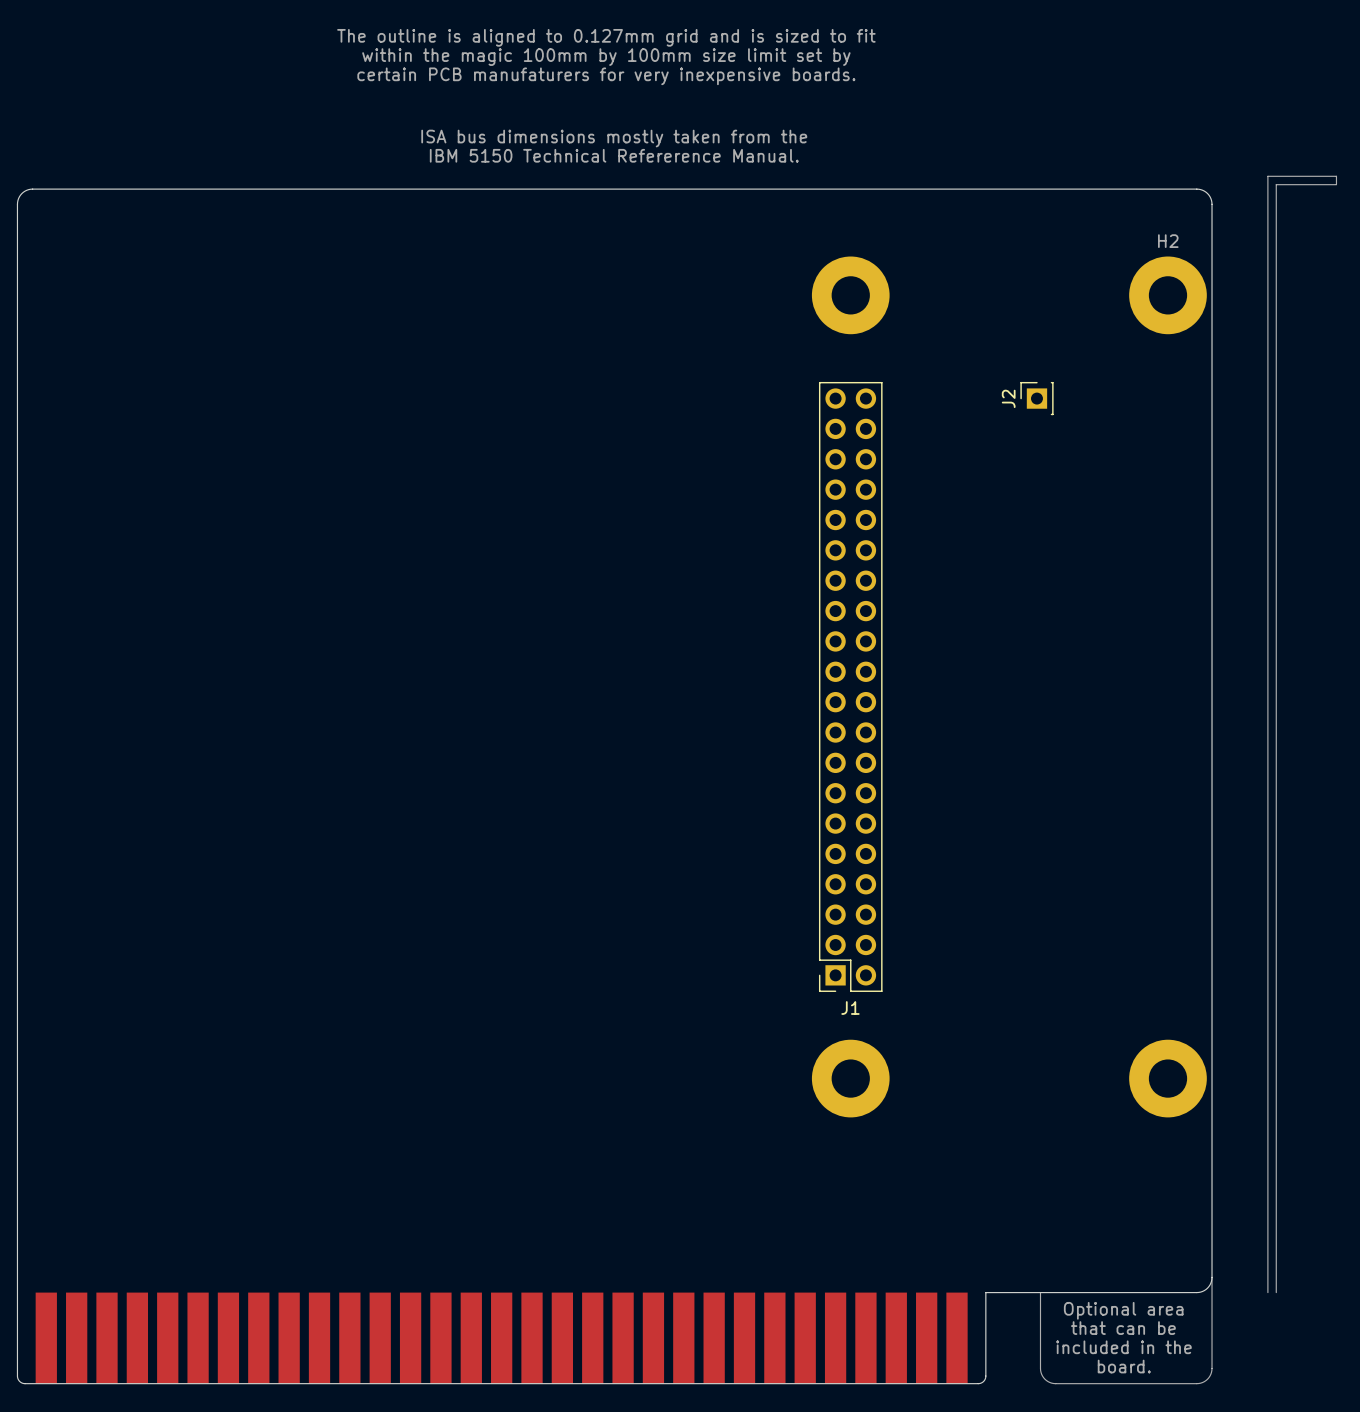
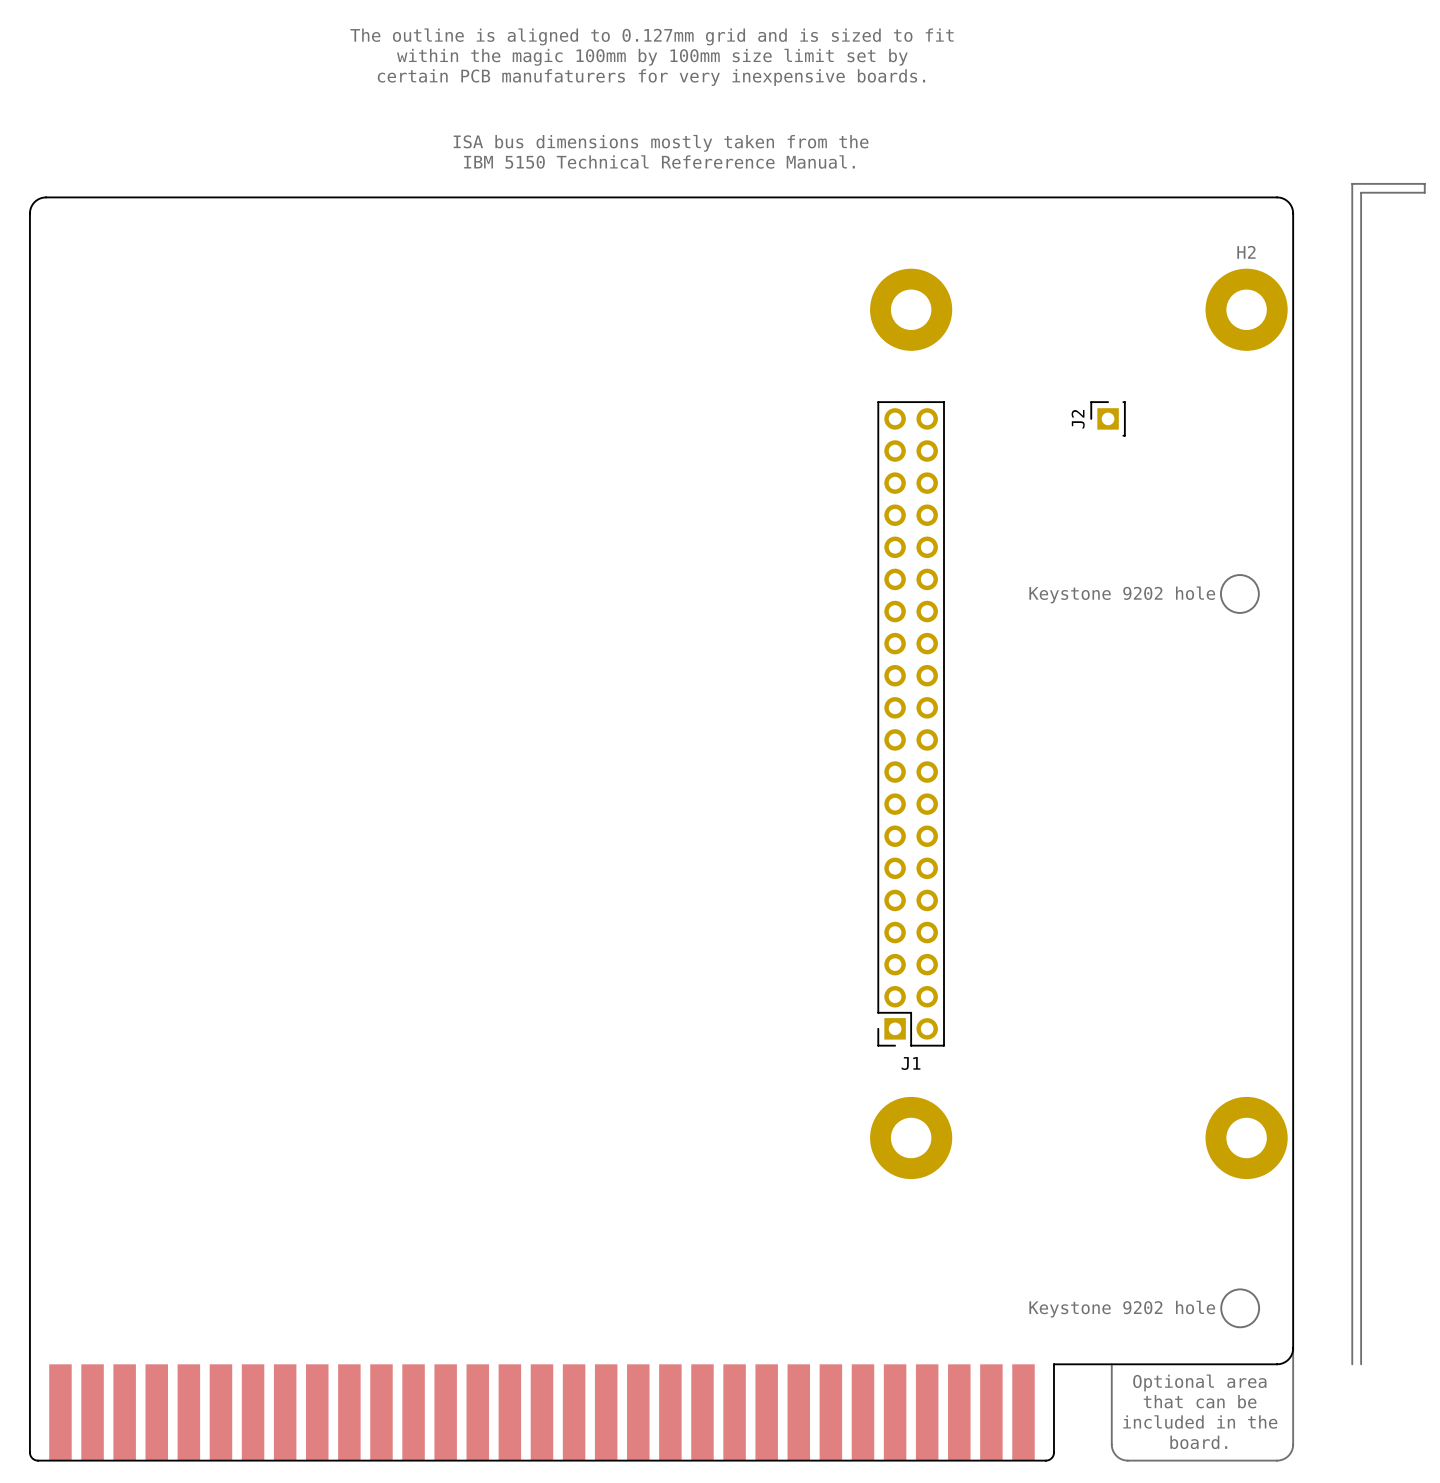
drawing: none -> [1220, 574, 1260, 614]
text: none -> Keystone 9202 hole (1122, 594)
drawing: none -> [1220, 1288, 1261, 1329]
text: none -> Keystone 9202 hole (1122, 1309)

